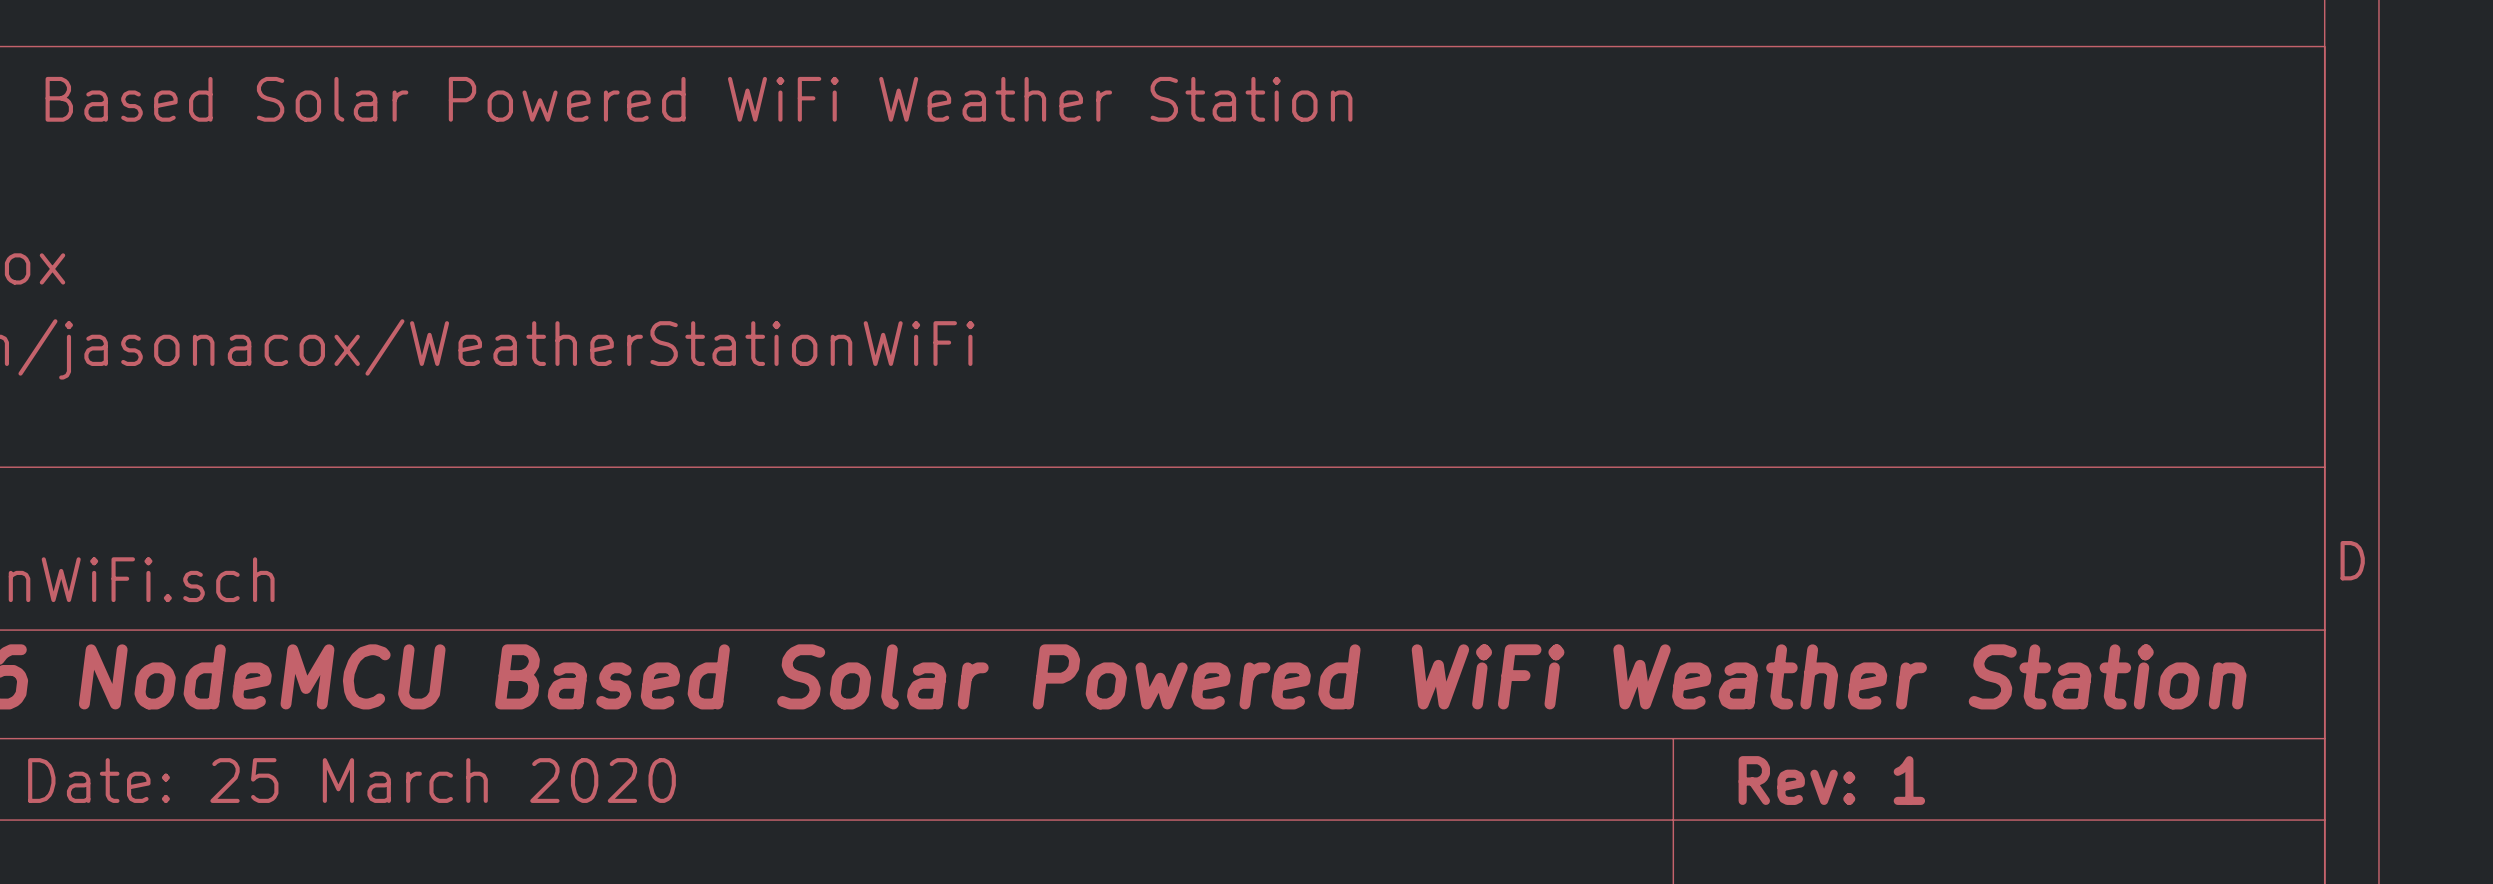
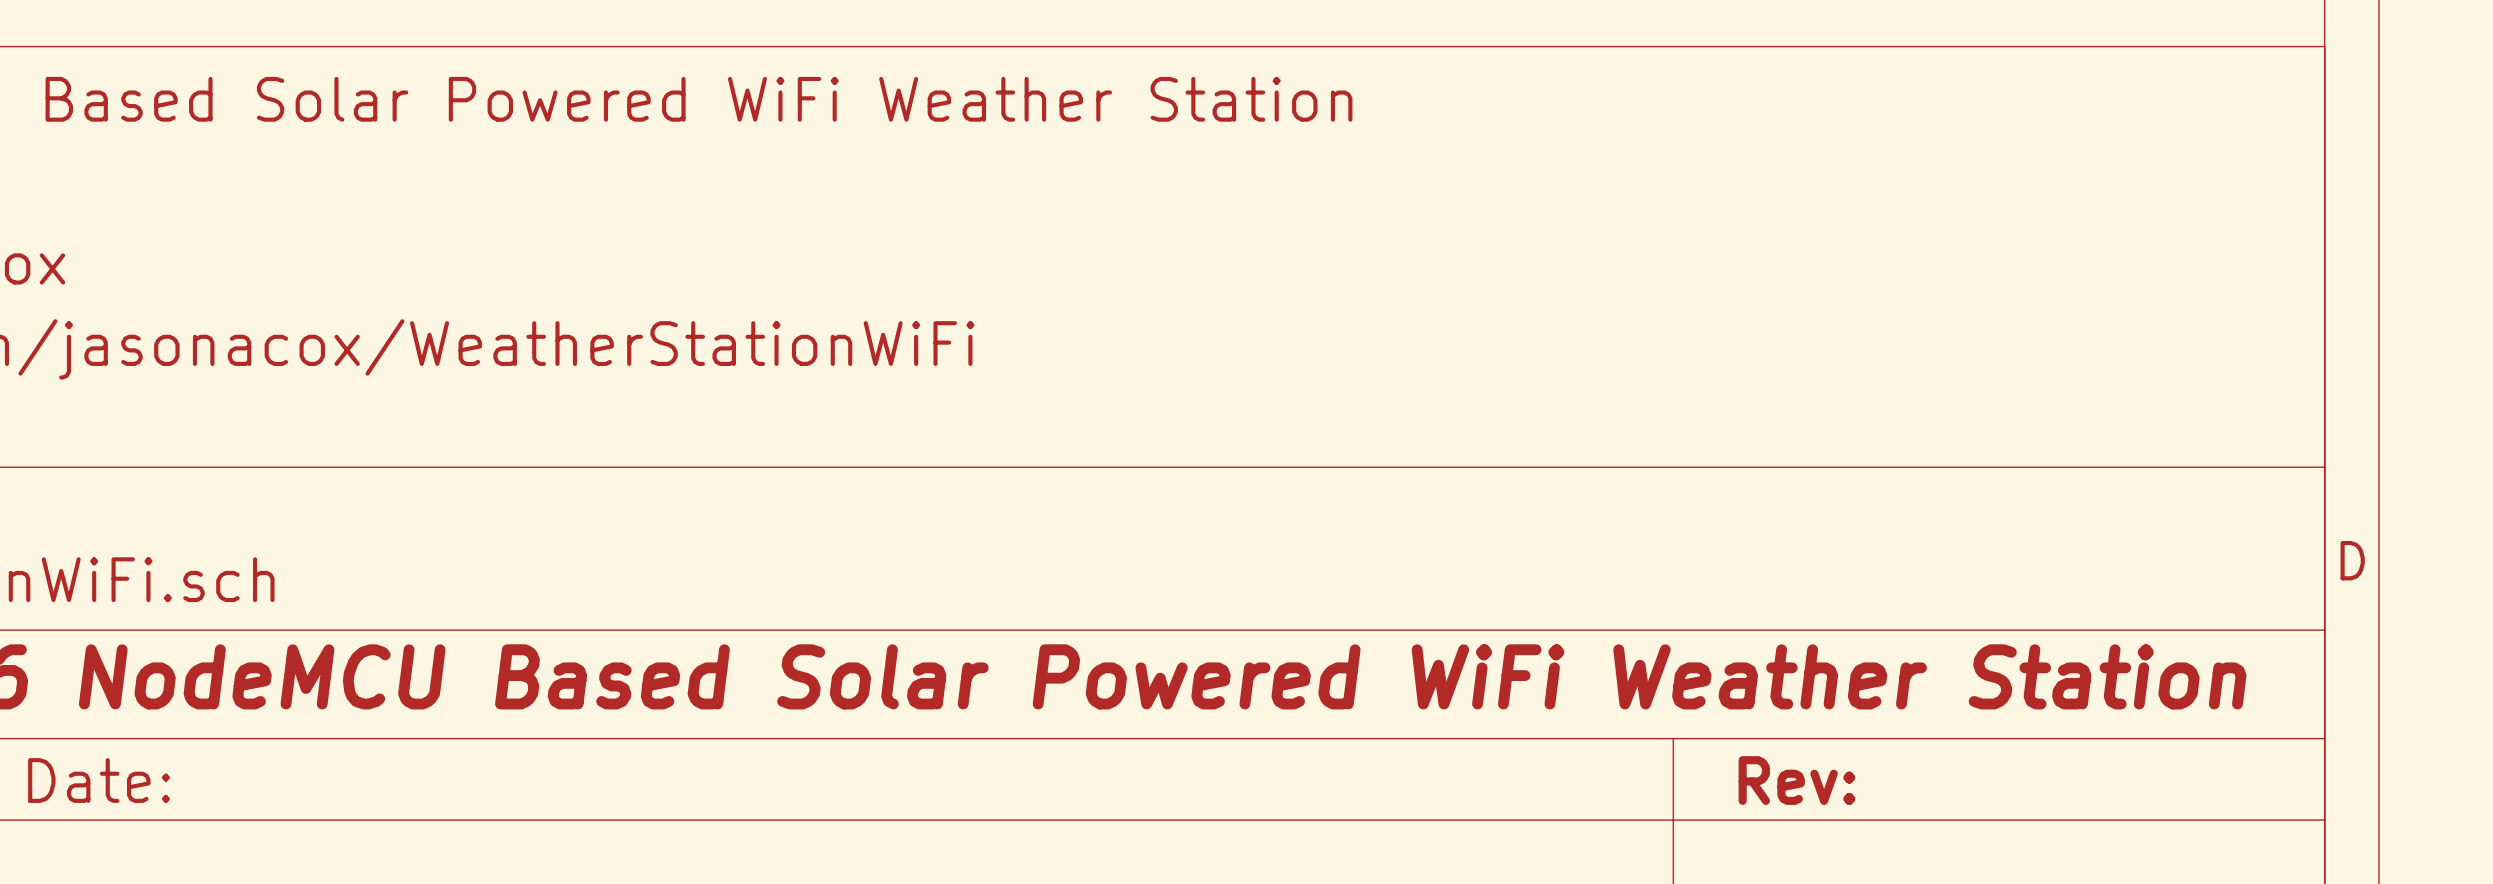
title block: Date: 25 March 2020 (352, 780) -> Date: (99, 780)
title block: Rev: 1 (1831, 780) -> Rev: (1796, 780)

